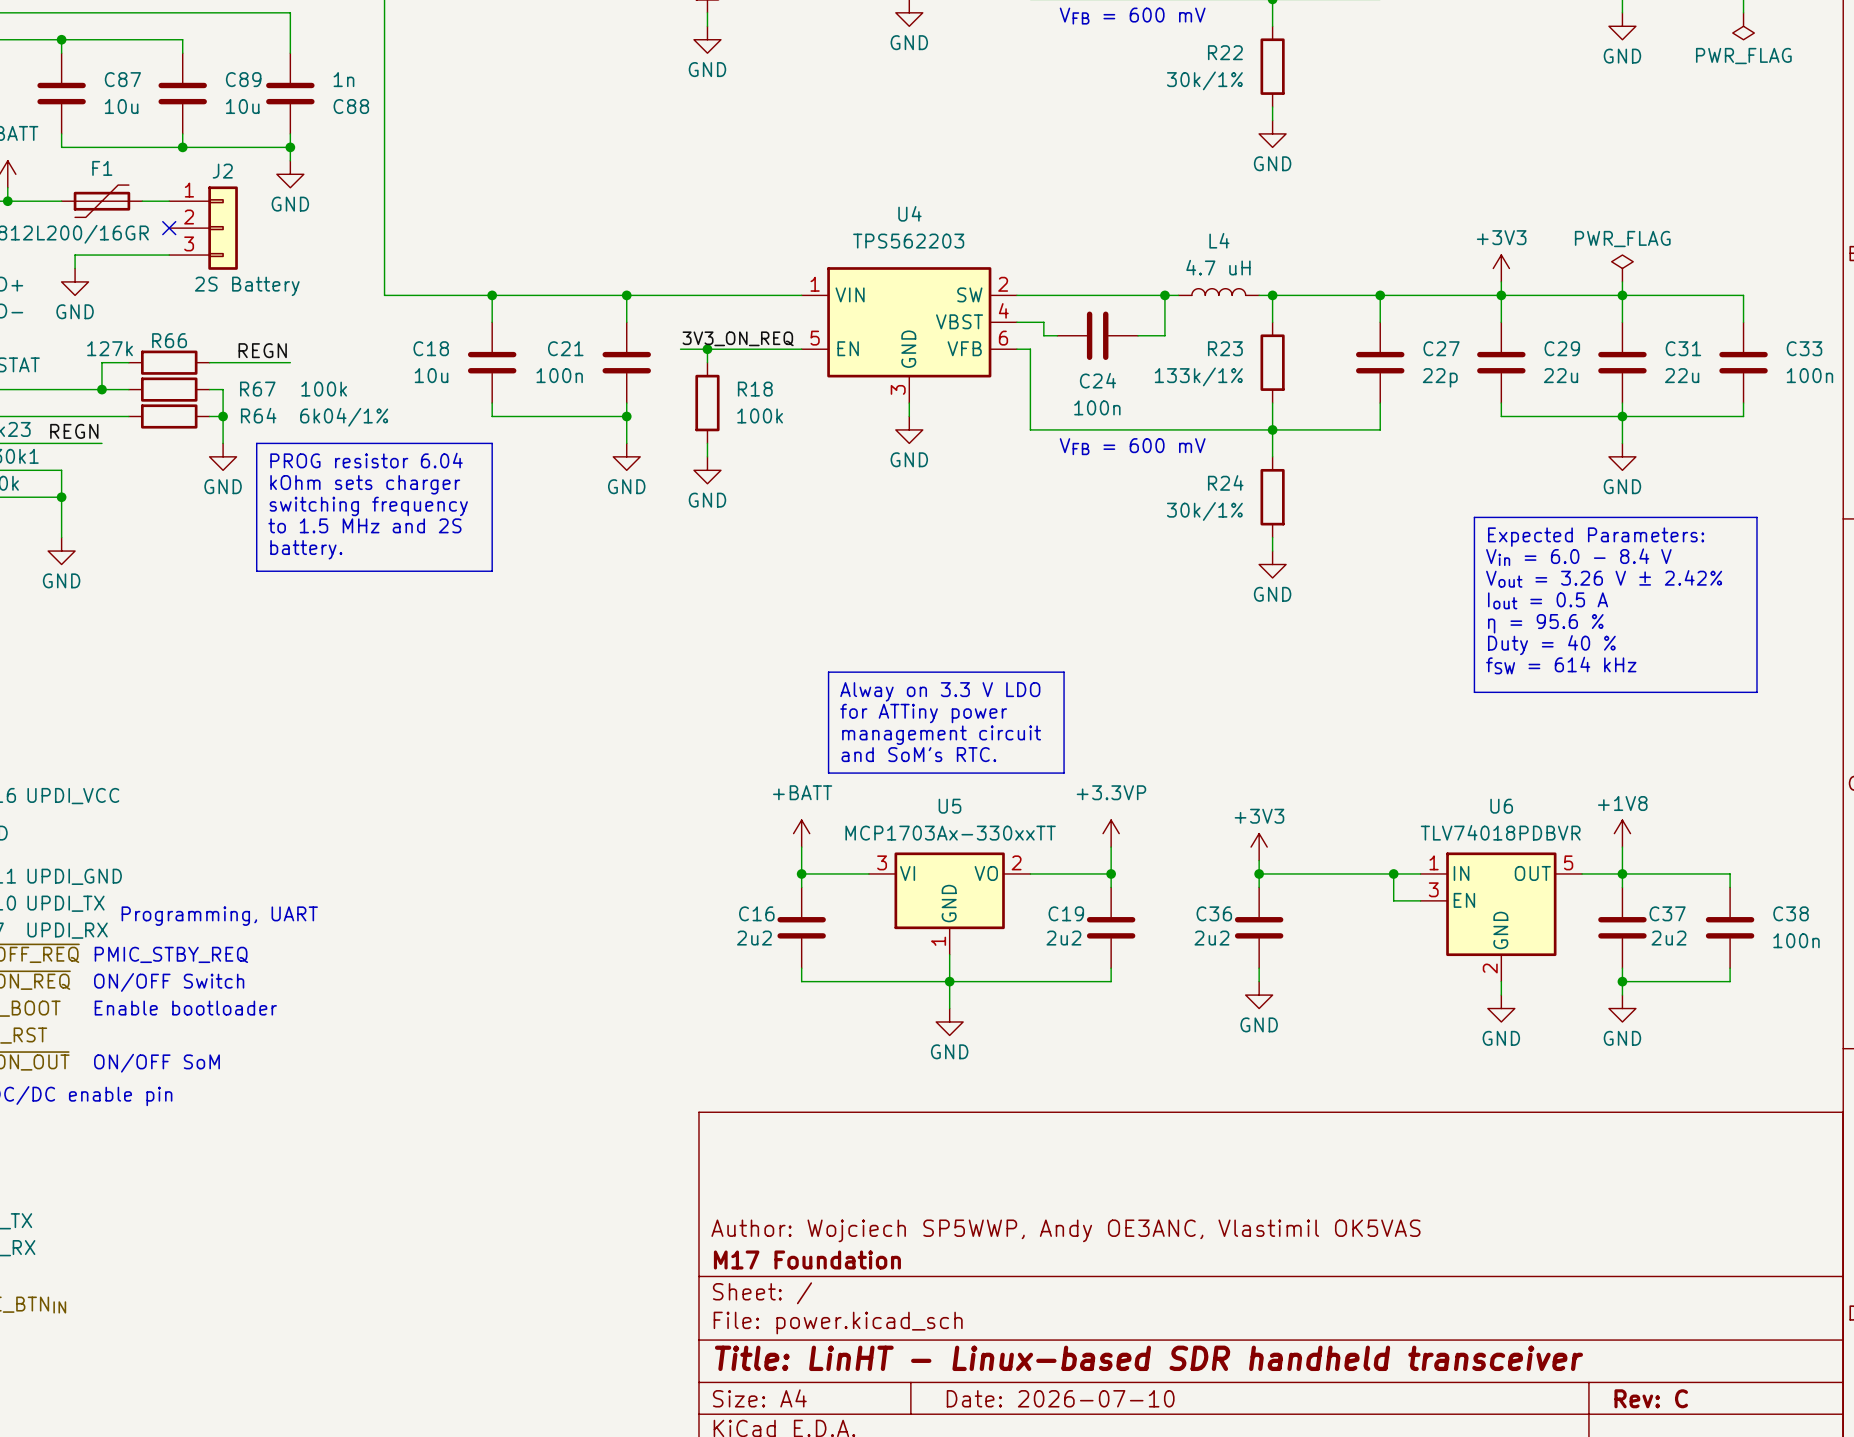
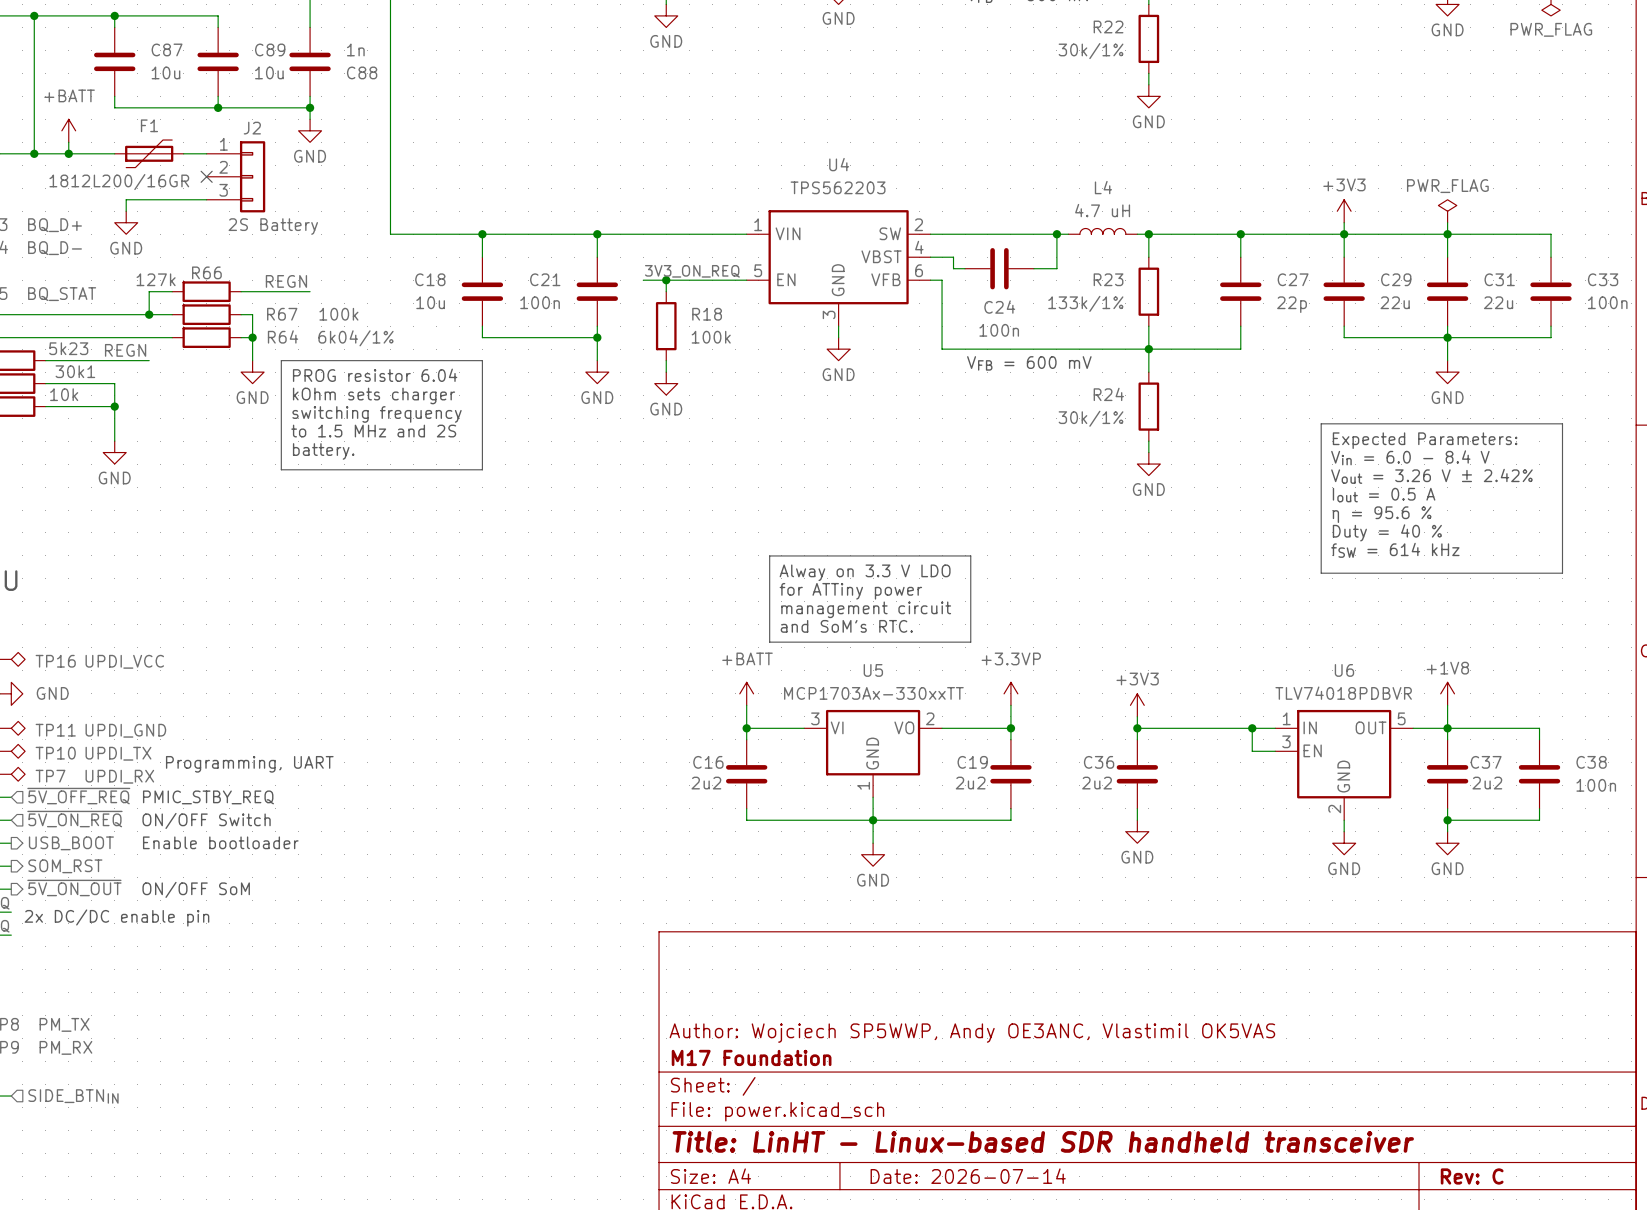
title block: Date: 2026-07-10 (1060, 1398) -> Date: 2026-07-14 (968, 1176)

